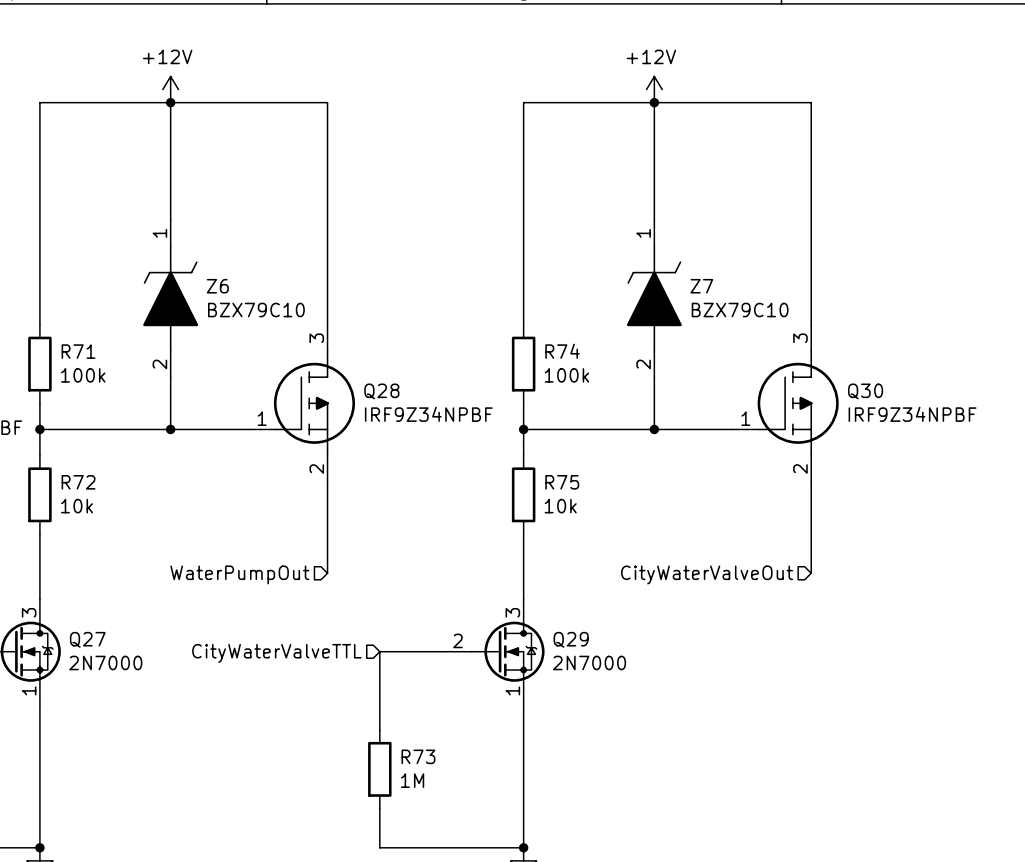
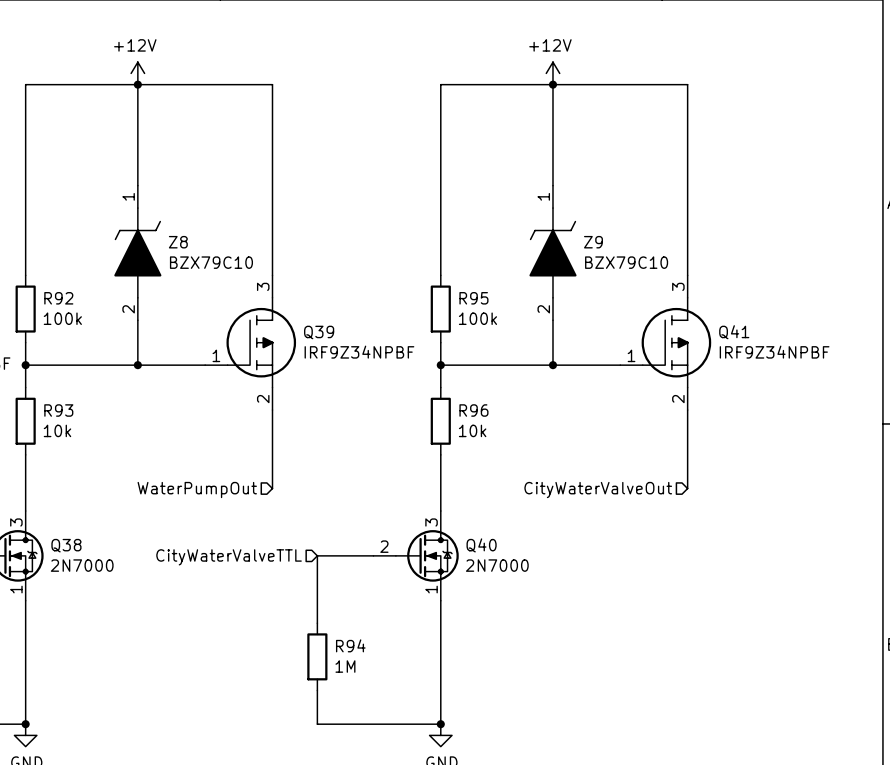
Z6 name: Z6 (217, 286) -> Z8 (178, 242)
Z7 name: Z7 (701, 286) -> Z9 (593, 242)
R71 name: R71 (78, 351) -> R92 (58, 298)
R74 name: R74 (562, 351) -> R95 (473, 298)
Q28 name: Q28 (381, 391) -> Q39 (319, 332)
Q30 name: Q30 (865, 391) -> Q41 (734, 332)
R72 name: R72 (78, 482) -> R93 (58, 410)
R75 name: R75 (562, 482) -> R96 (473, 410)
Q27 name: Q27 (87, 639) -> Q38 (66, 545)
Q29 name: Q29 (571, 639) -> Q40 (481, 545)
R73 name: R73 (418, 756) -> R94 (350, 645)

